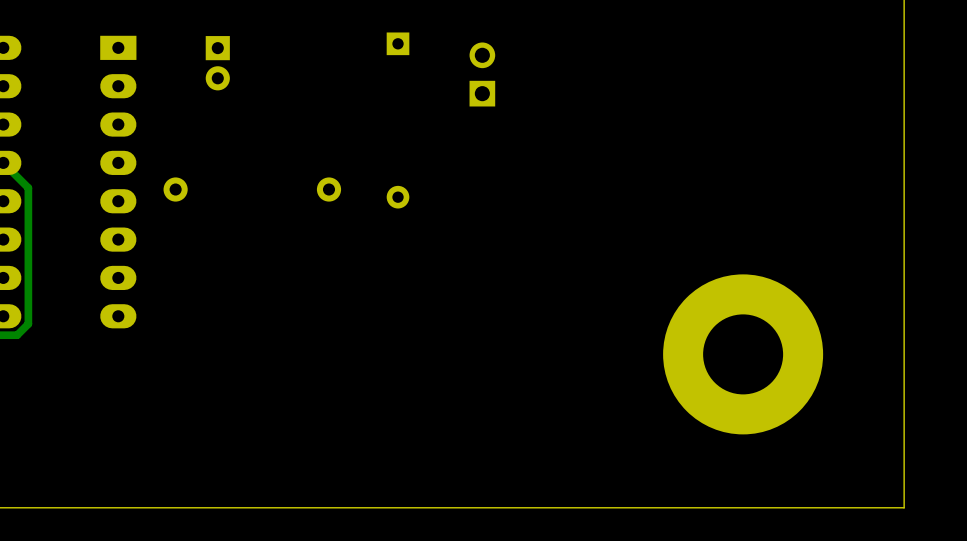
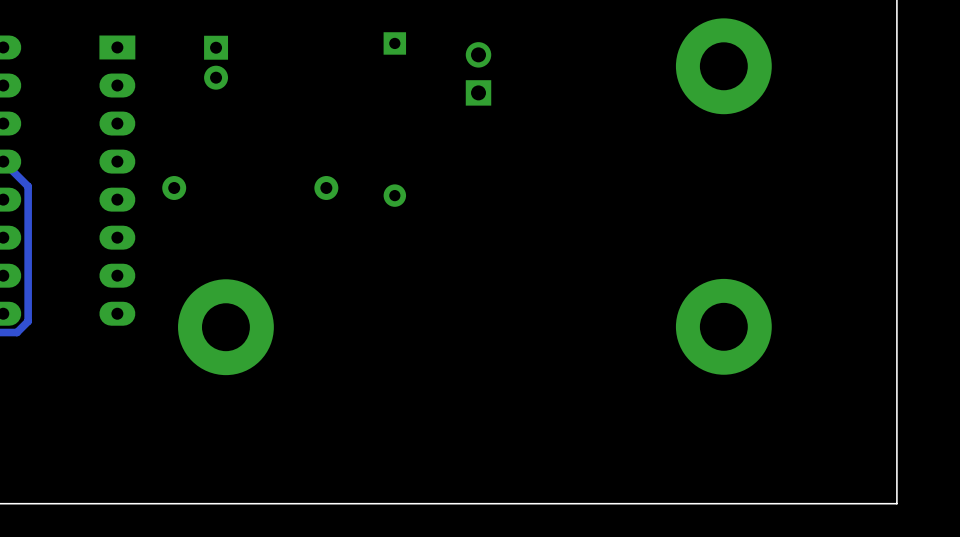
part: none -> (723, 66)
part: none -> (225, 327)
part: none -> (723, 326)
part: (743, 354) -> none

